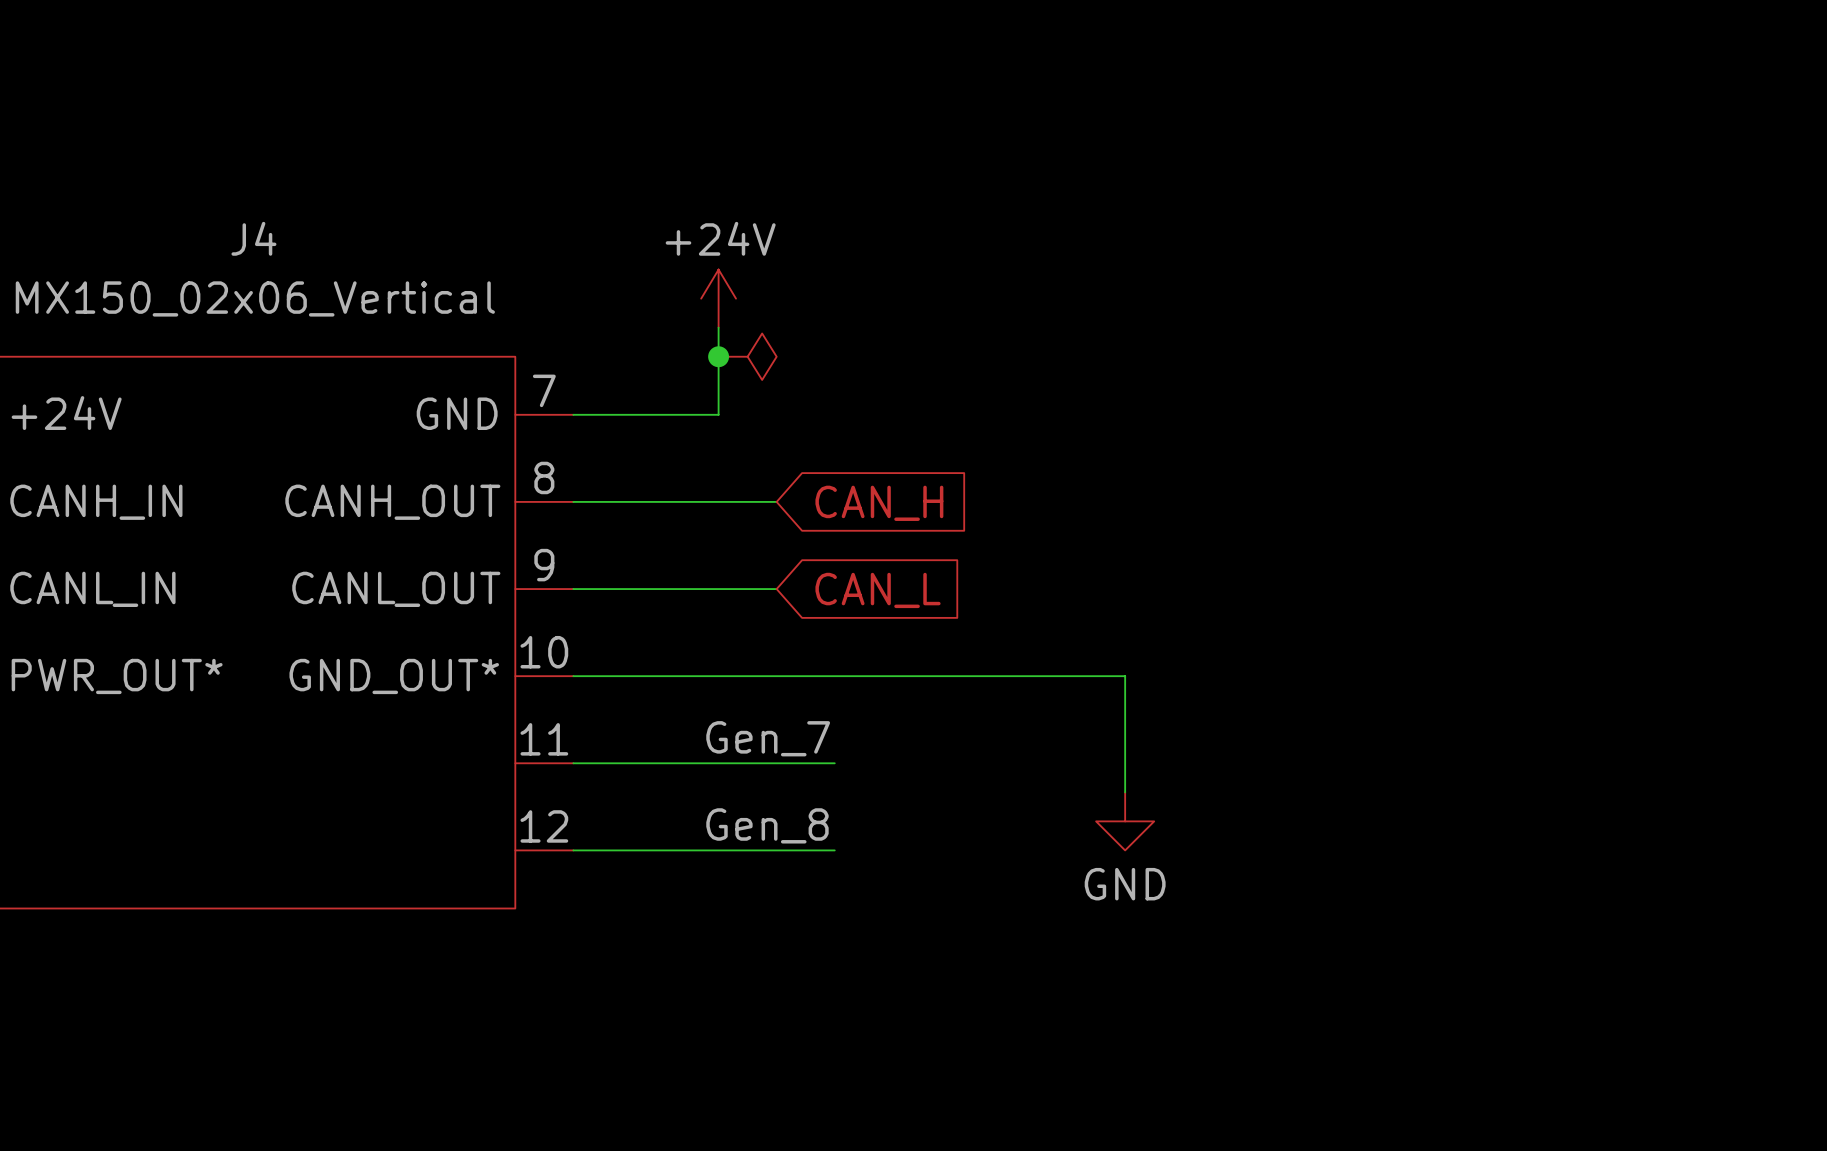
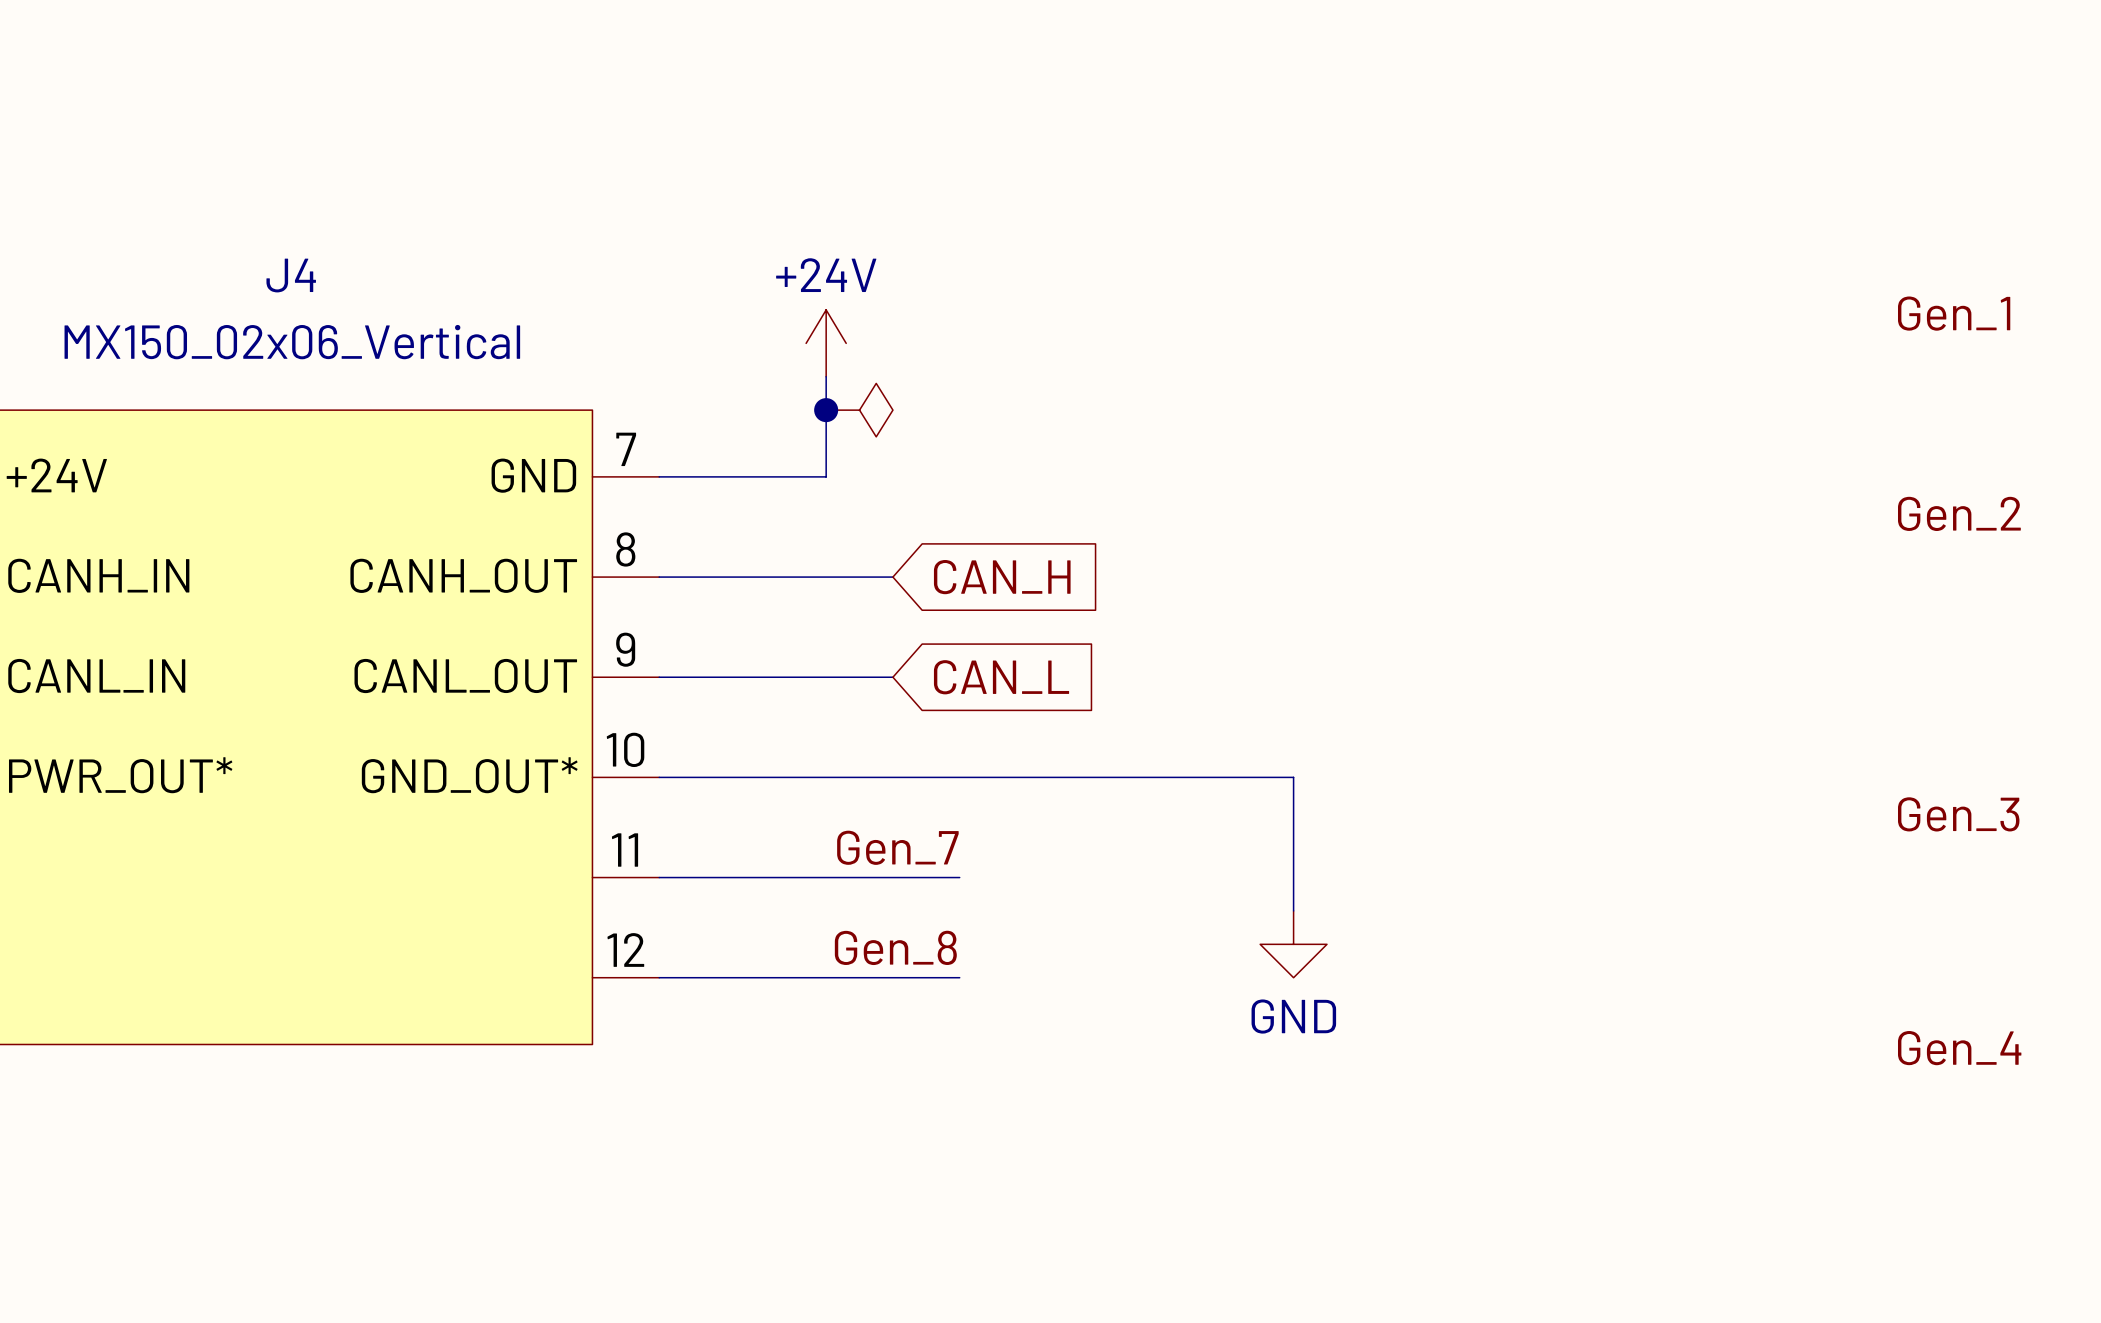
label: none -> Gen_1 (1954, 313)
label: none -> Gen_2 (1959, 513)
label: none -> Gen_3 (1958, 814)
label: none -> Gen_4 (1959, 1048)

